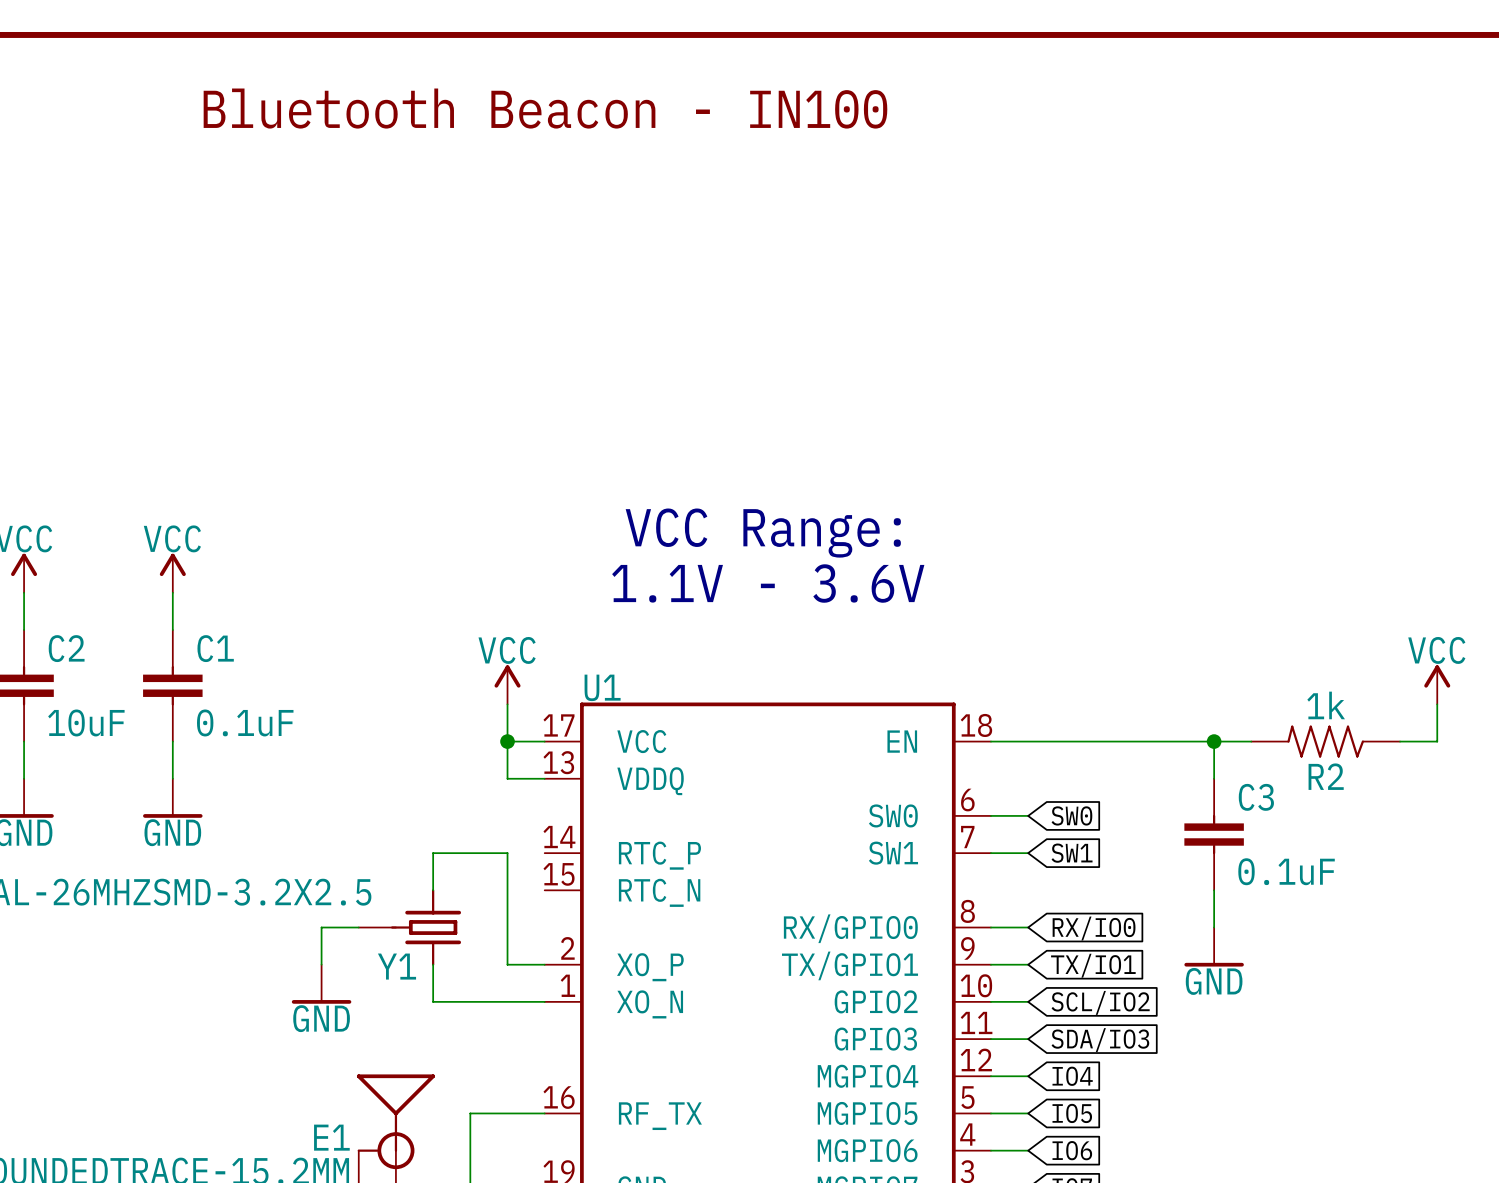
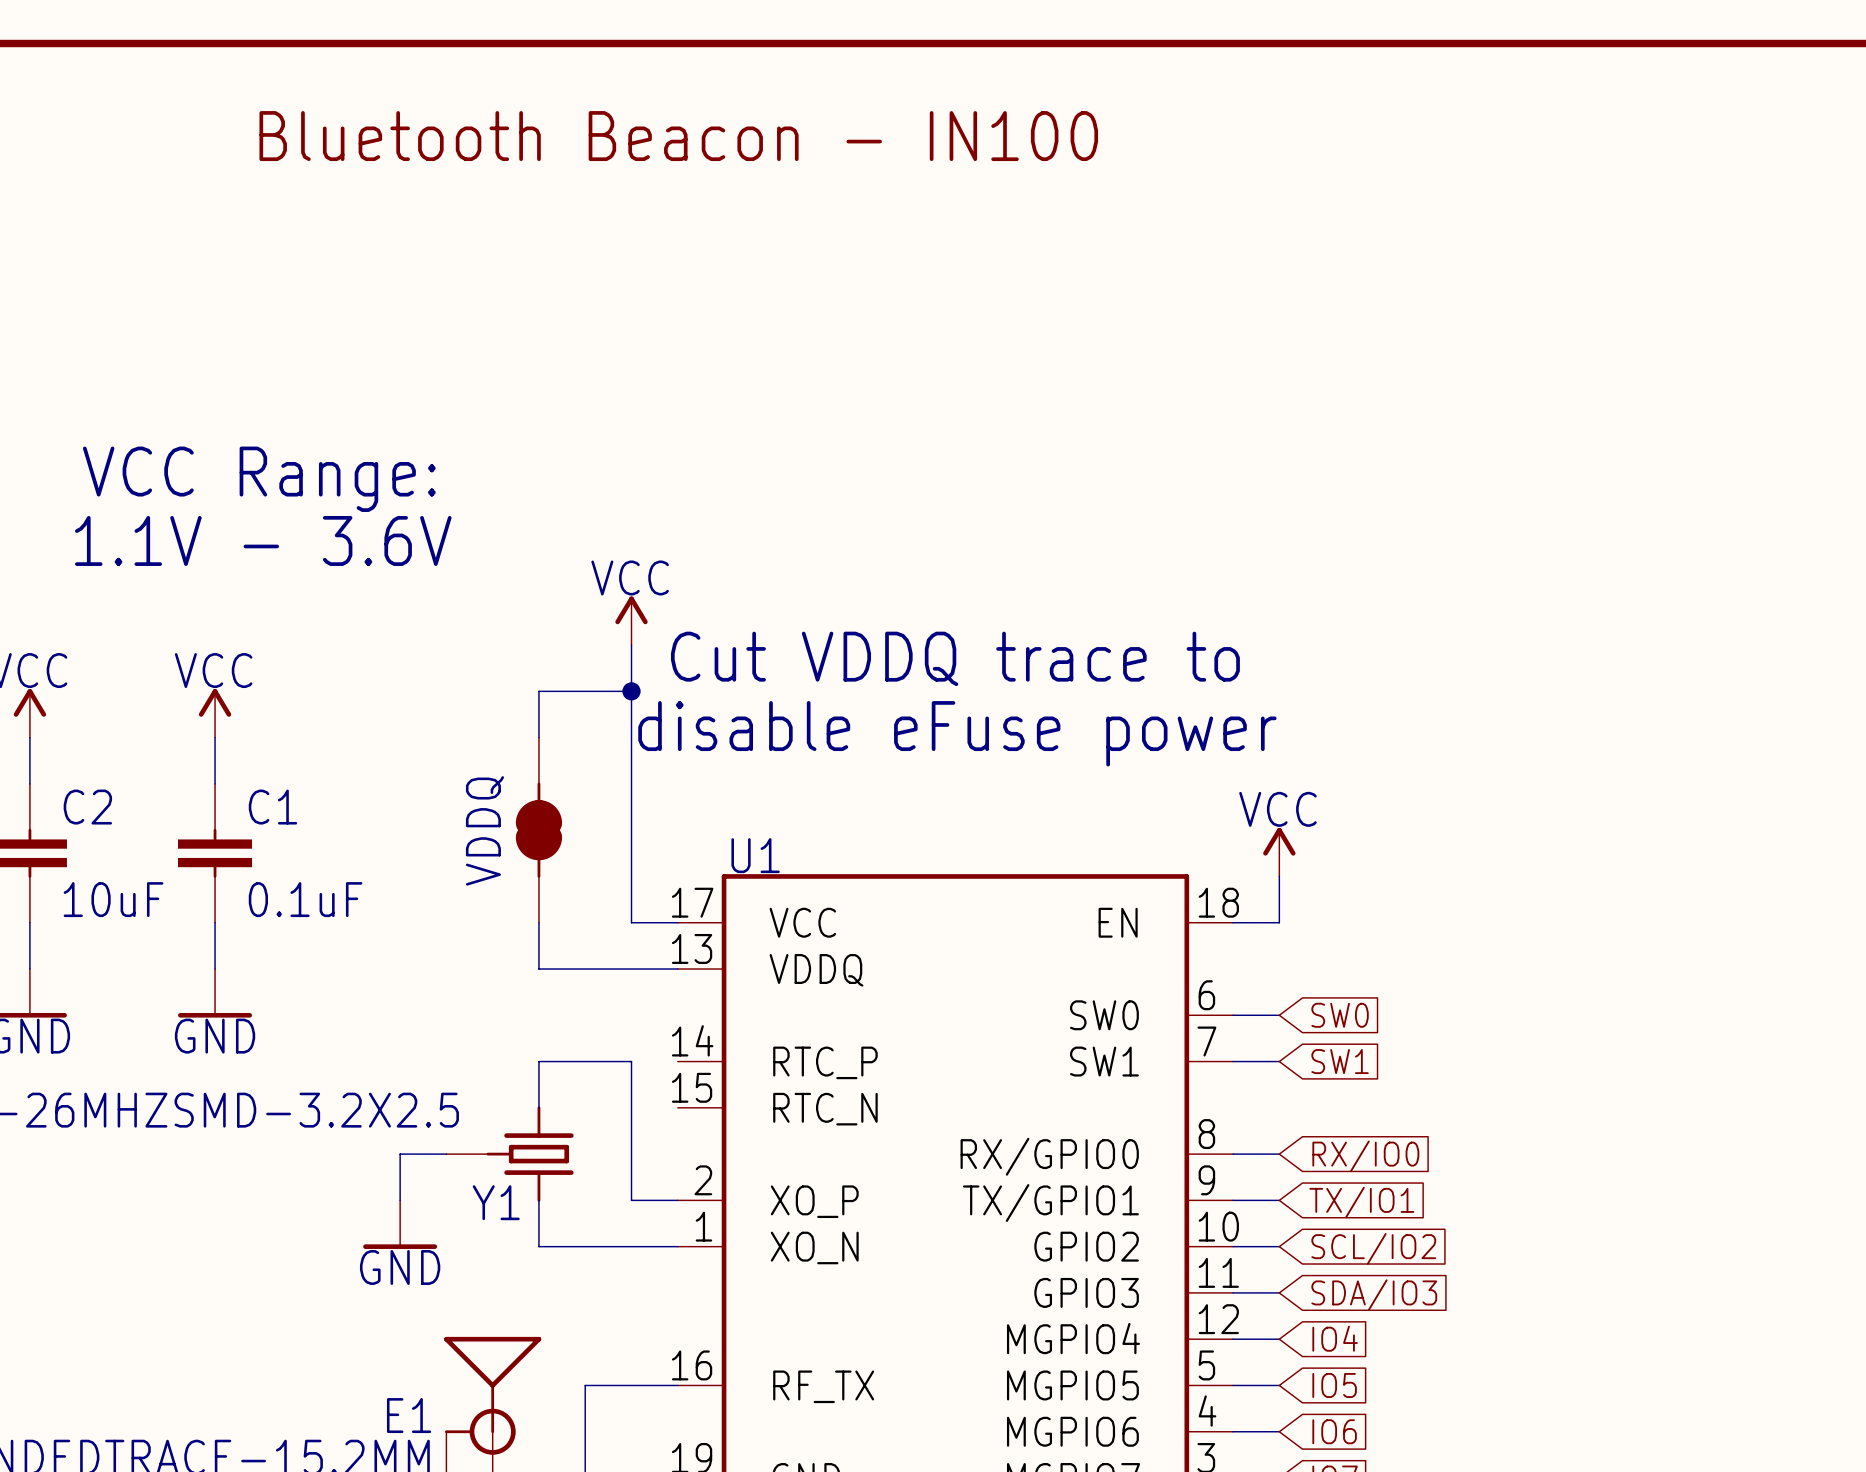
text: none -> VCC Range: (259, 479)
text: none -> 1.1V - 3.6V (263, 540)
wire: none -> (631, 645) (631, 876)
text: VCC Range: (763, 533) -> Cut VDDQ trace to (955, 658)
wire: none -> (631, 691) (538, 691) (538, 737)
junction: none -> (631, 691)
text: 1.1V - 3.6V (768, 583) -> disable eFuse power (957, 733)
VDDQ: none -> (538, 830)
power symbol position: VCC (507, 684) -> VCC (631, 620)
power symbol: none -> VCC (1279, 852)
power symbol: VCC (1437, 684) -> none
wire: (1437, 704) (1437, 741) (1400, 741) -> none
wire: (507, 741) (507, 778) -> (538, 922) (538, 969) (631, 969)
junction: (507, 741) -> none
wire: (1028, 741) (1251, 741) -> (1279, 922) (1279, 876)
wire: (1214, 741) (1214, 778) -> none
junction: (1214, 741) -> none
R2: 1k (1325, 741) -> none
C3: 0.1uF (1214, 834) -> none
wire: (1214, 890) (1214, 927) -> none
power symbol: GND (1214, 947) -> none

